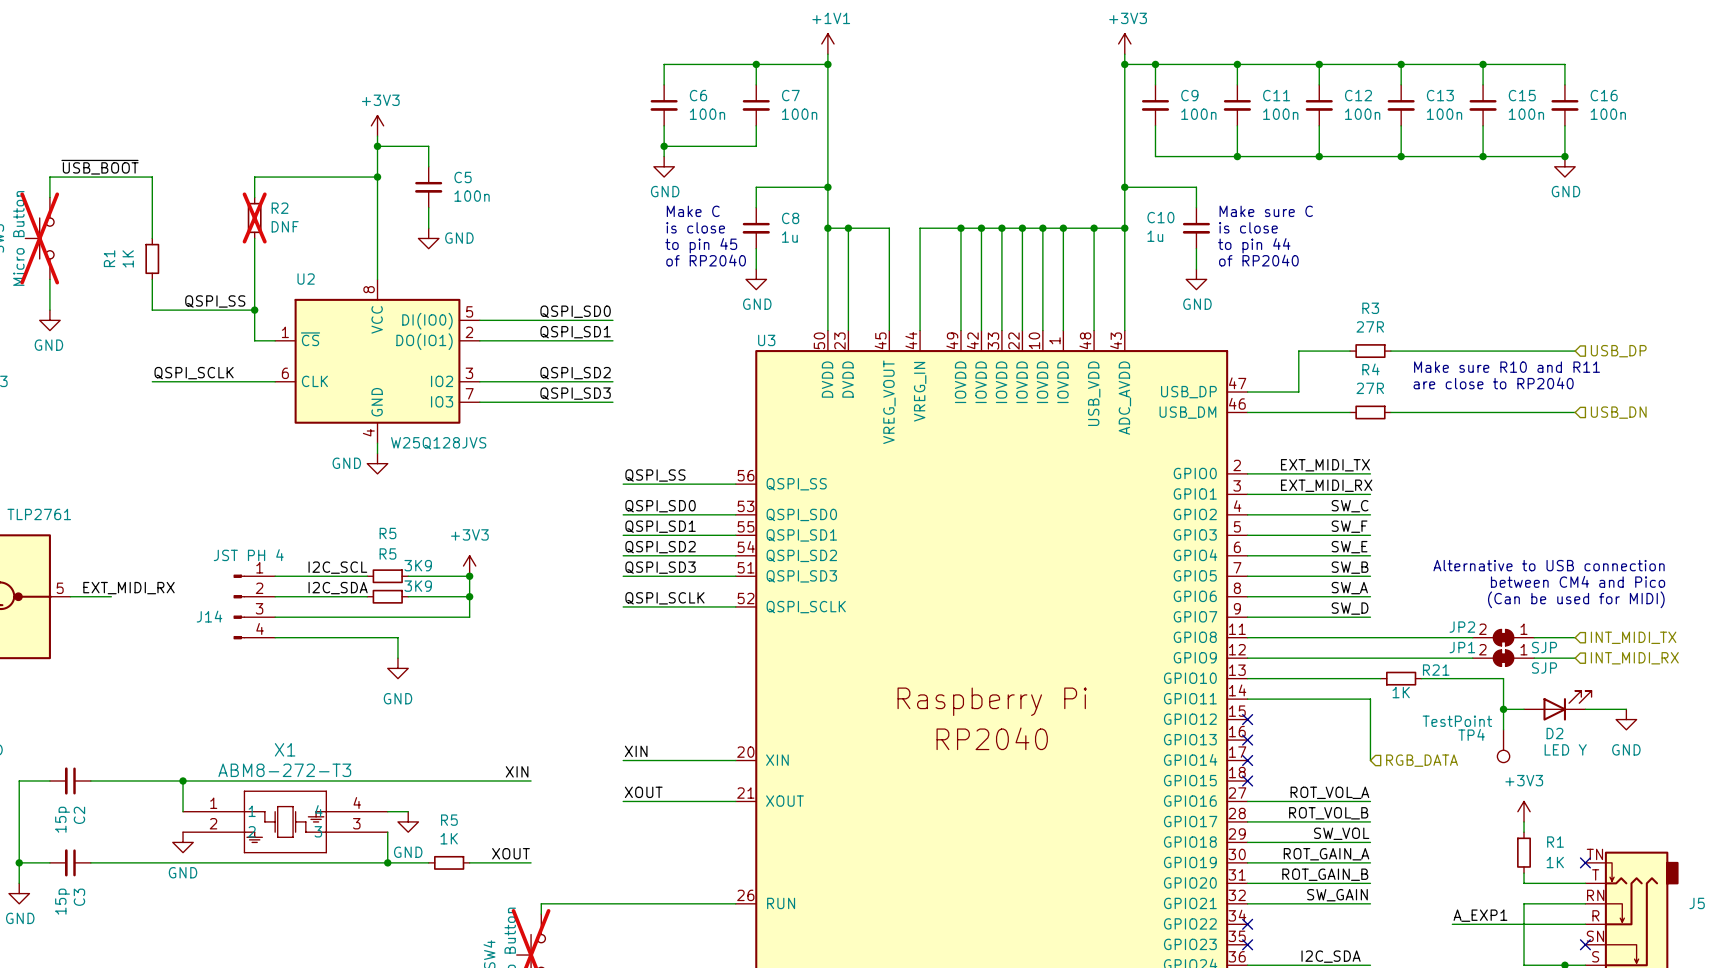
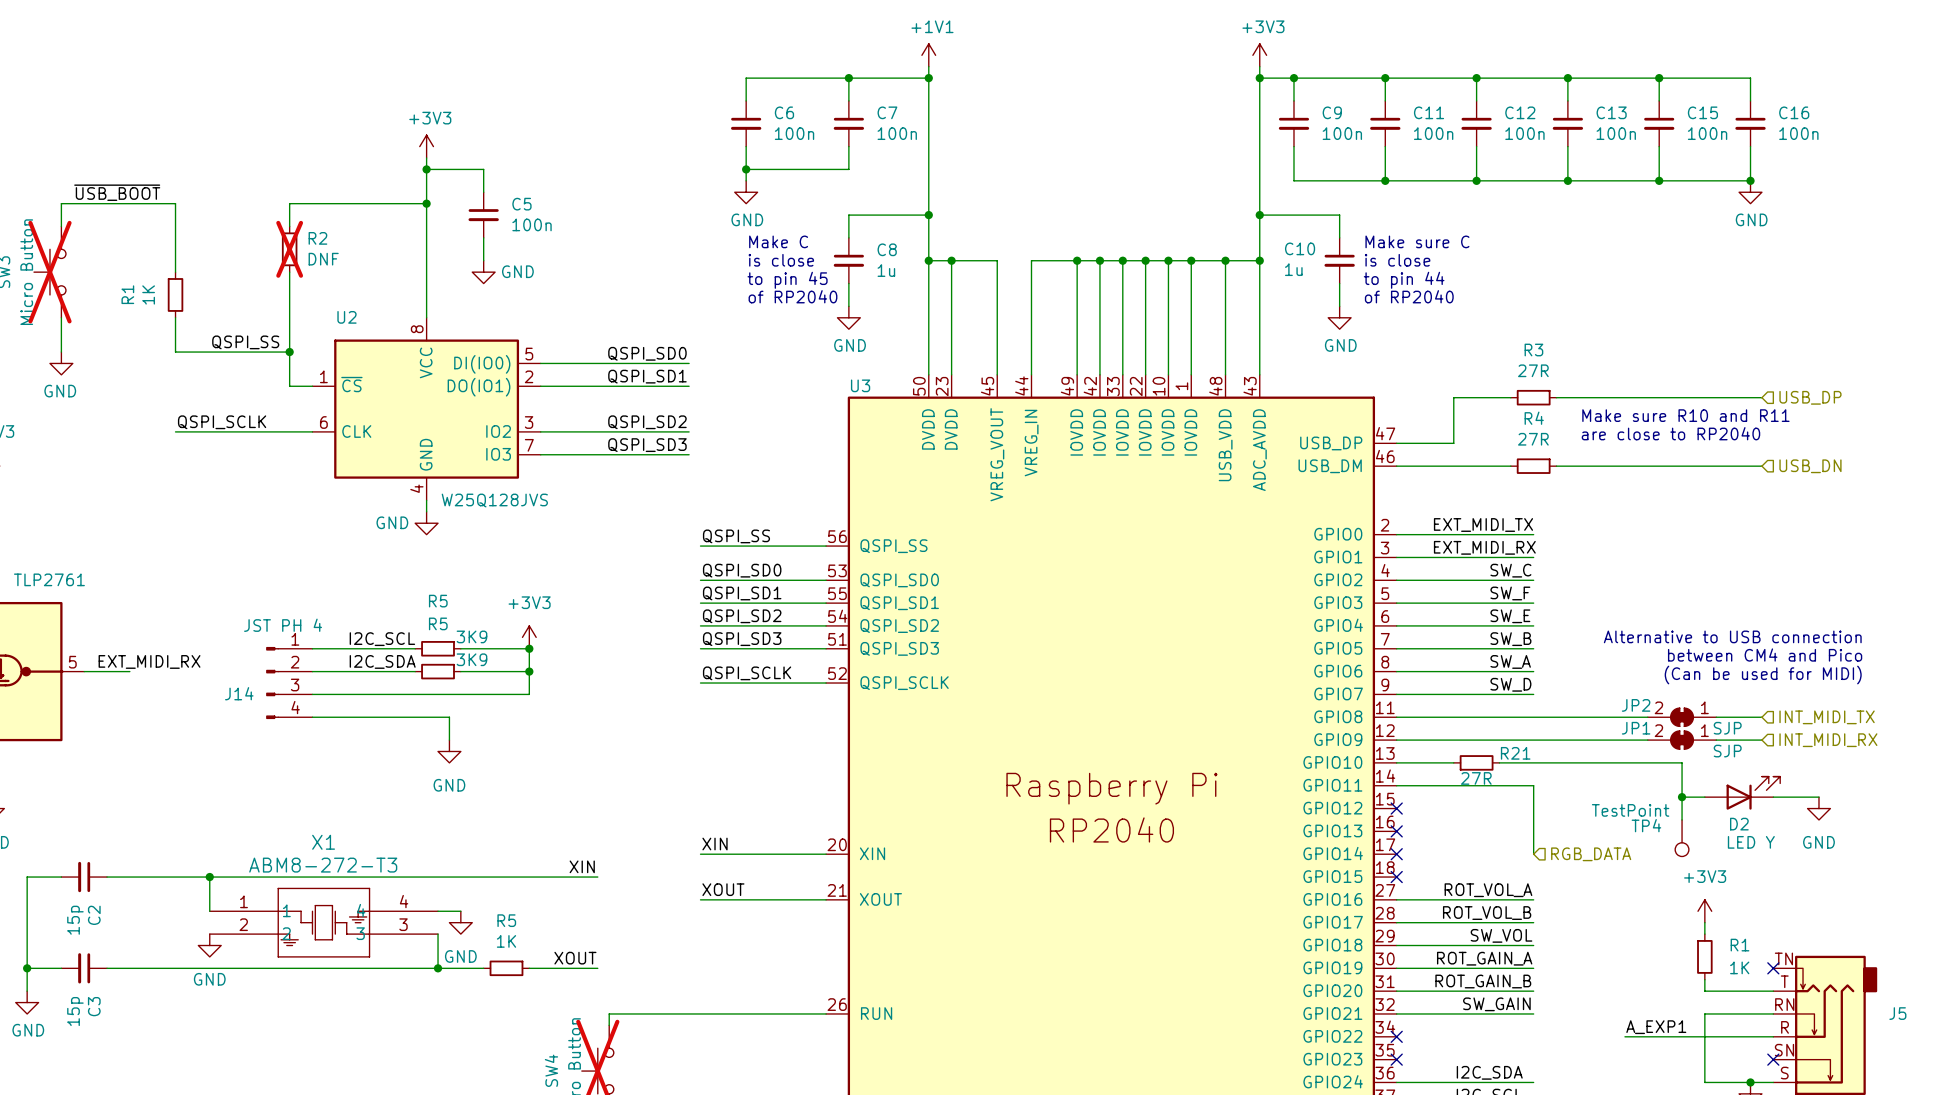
wire: (1298, 678) (1339, 678) -> (1545, 762) (1590, 762)
R21 position: (1401, 678) -> (1476, 762)
R21 value: 1K (1401, 692) -> 27R (1476, 778)

